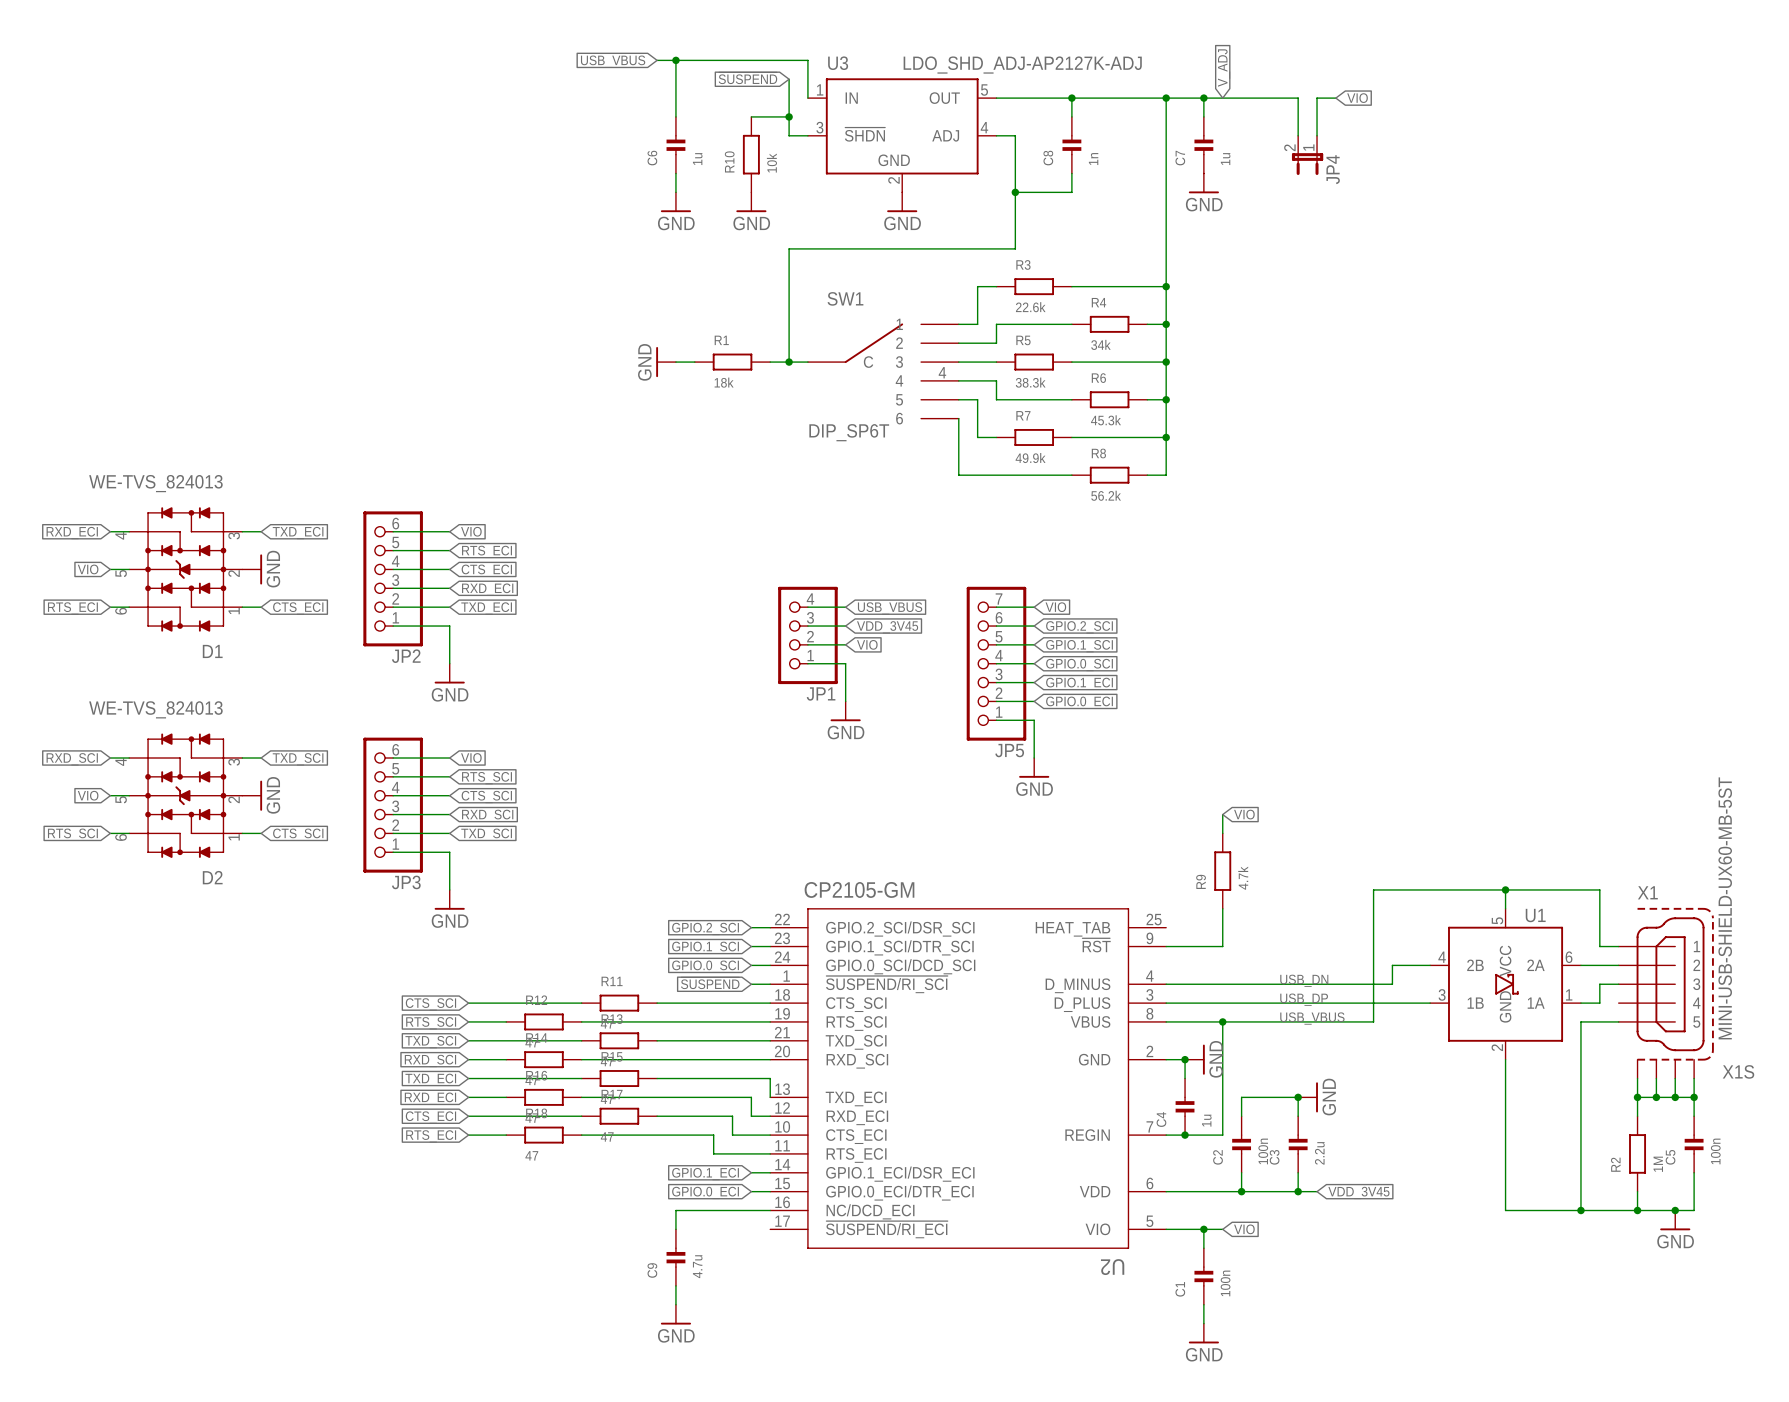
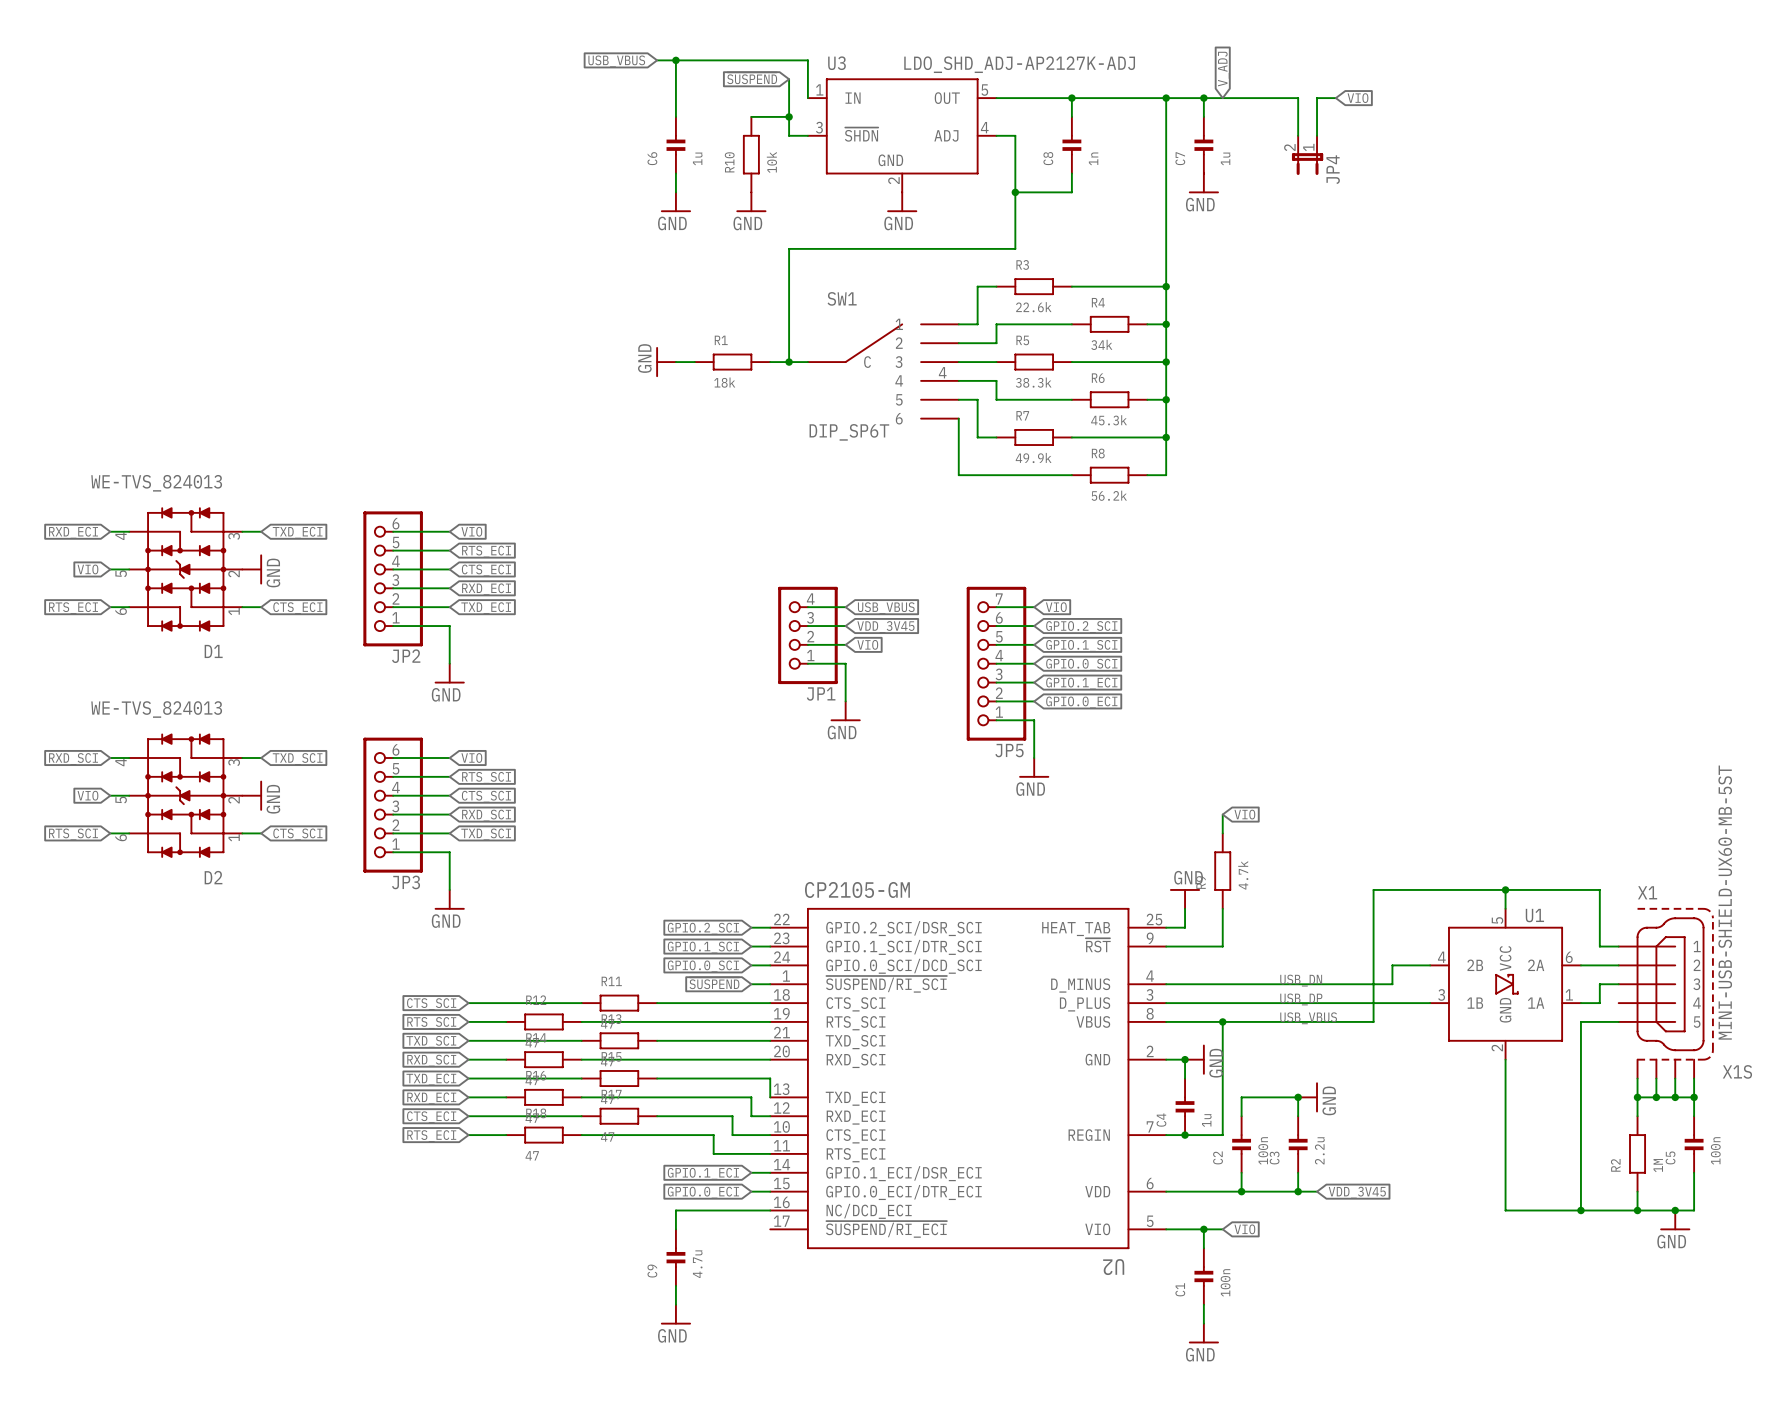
power symbol: none -> GND (1185, 898)
wire: none -> (1185, 908) (1185, 927) (1166, 927)

